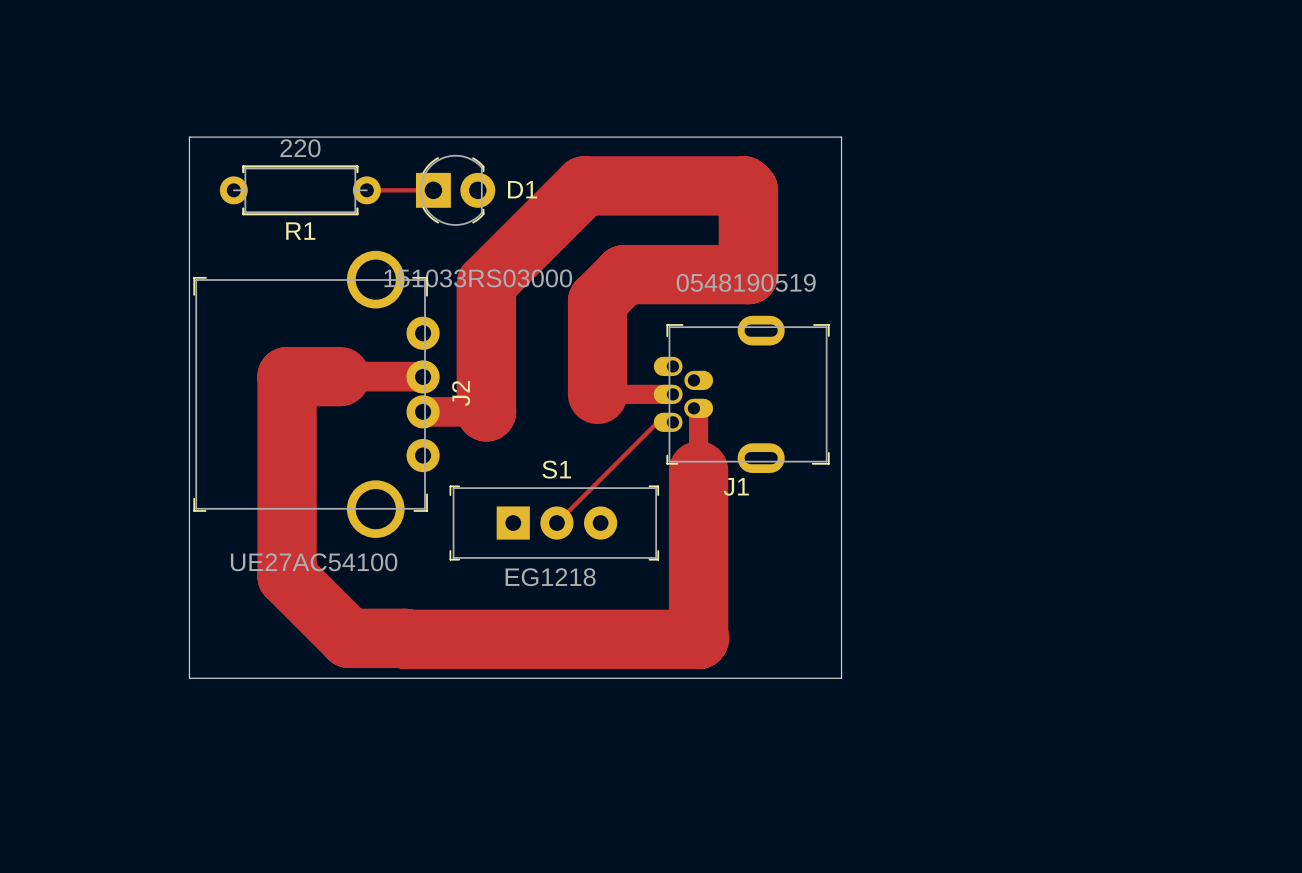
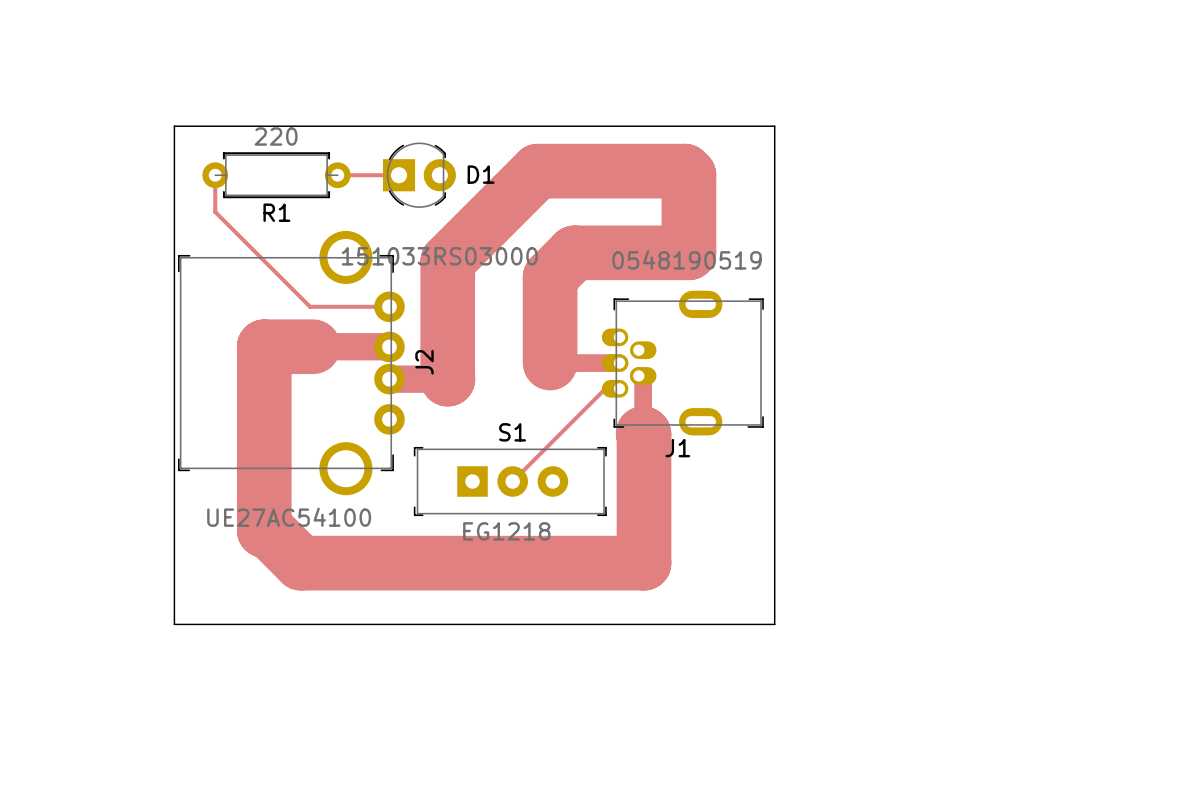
track: none -> (215, 179) (215, 211) (310, 306) (389, 306)
track: (698, 470) (698, 639) -> none
track: (287, 576) (349, 638) (698, 639) -> (264, 530) (268, 530) (301, 563) (644, 563) (643, 433)

